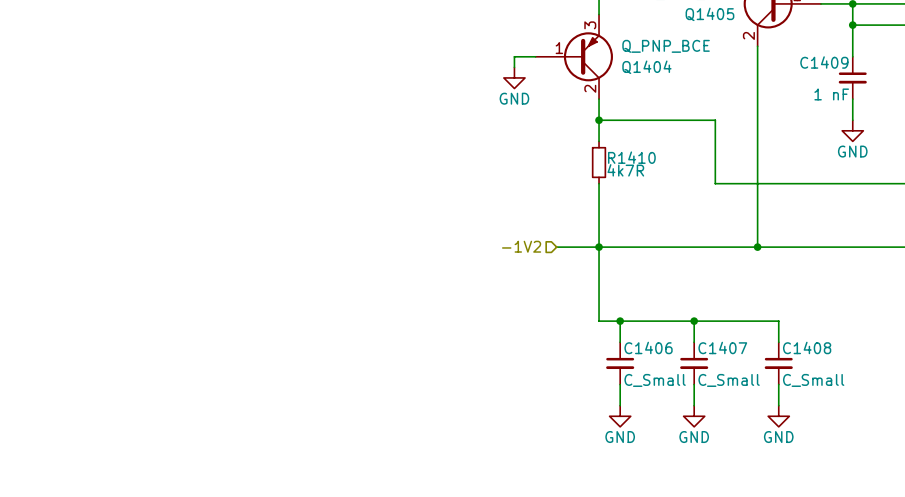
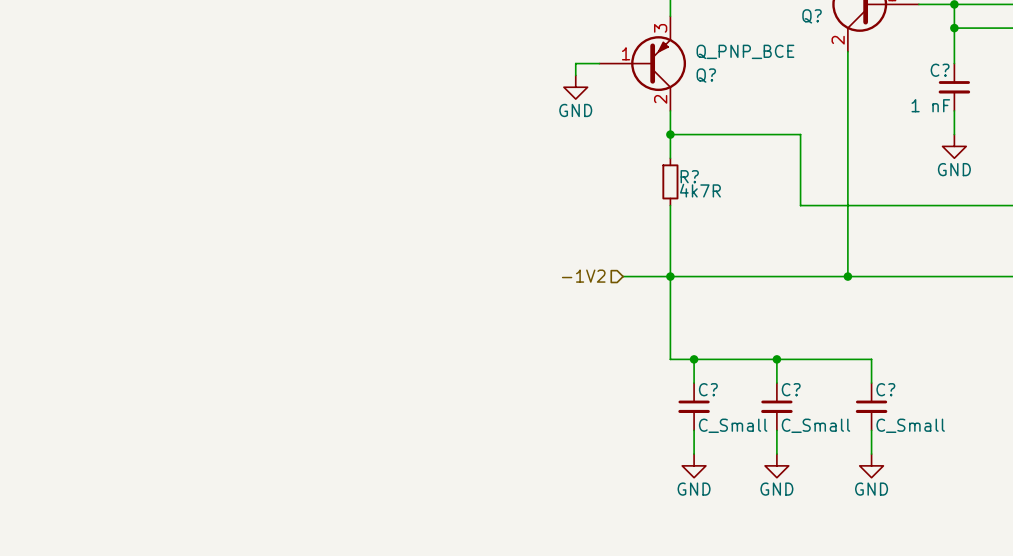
Q1405 name: Q1405 (709, 14) -> Q? (812, 16)
C1409 name: C1409 (824, 62) -> C? (940, 70)
Q1404 name: Q1404 (646, 67) -> Q? (706, 75)
R1410 name: R1410 (631, 157) -> R? (689, 176)
C1406 name: C1406 (648, 347) -> C? (708, 389)
C1407 name: C1407 (722, 347) -> C? (791, 389)
C1408 name: C1408 (807, 347) -> C? (885, 389)

